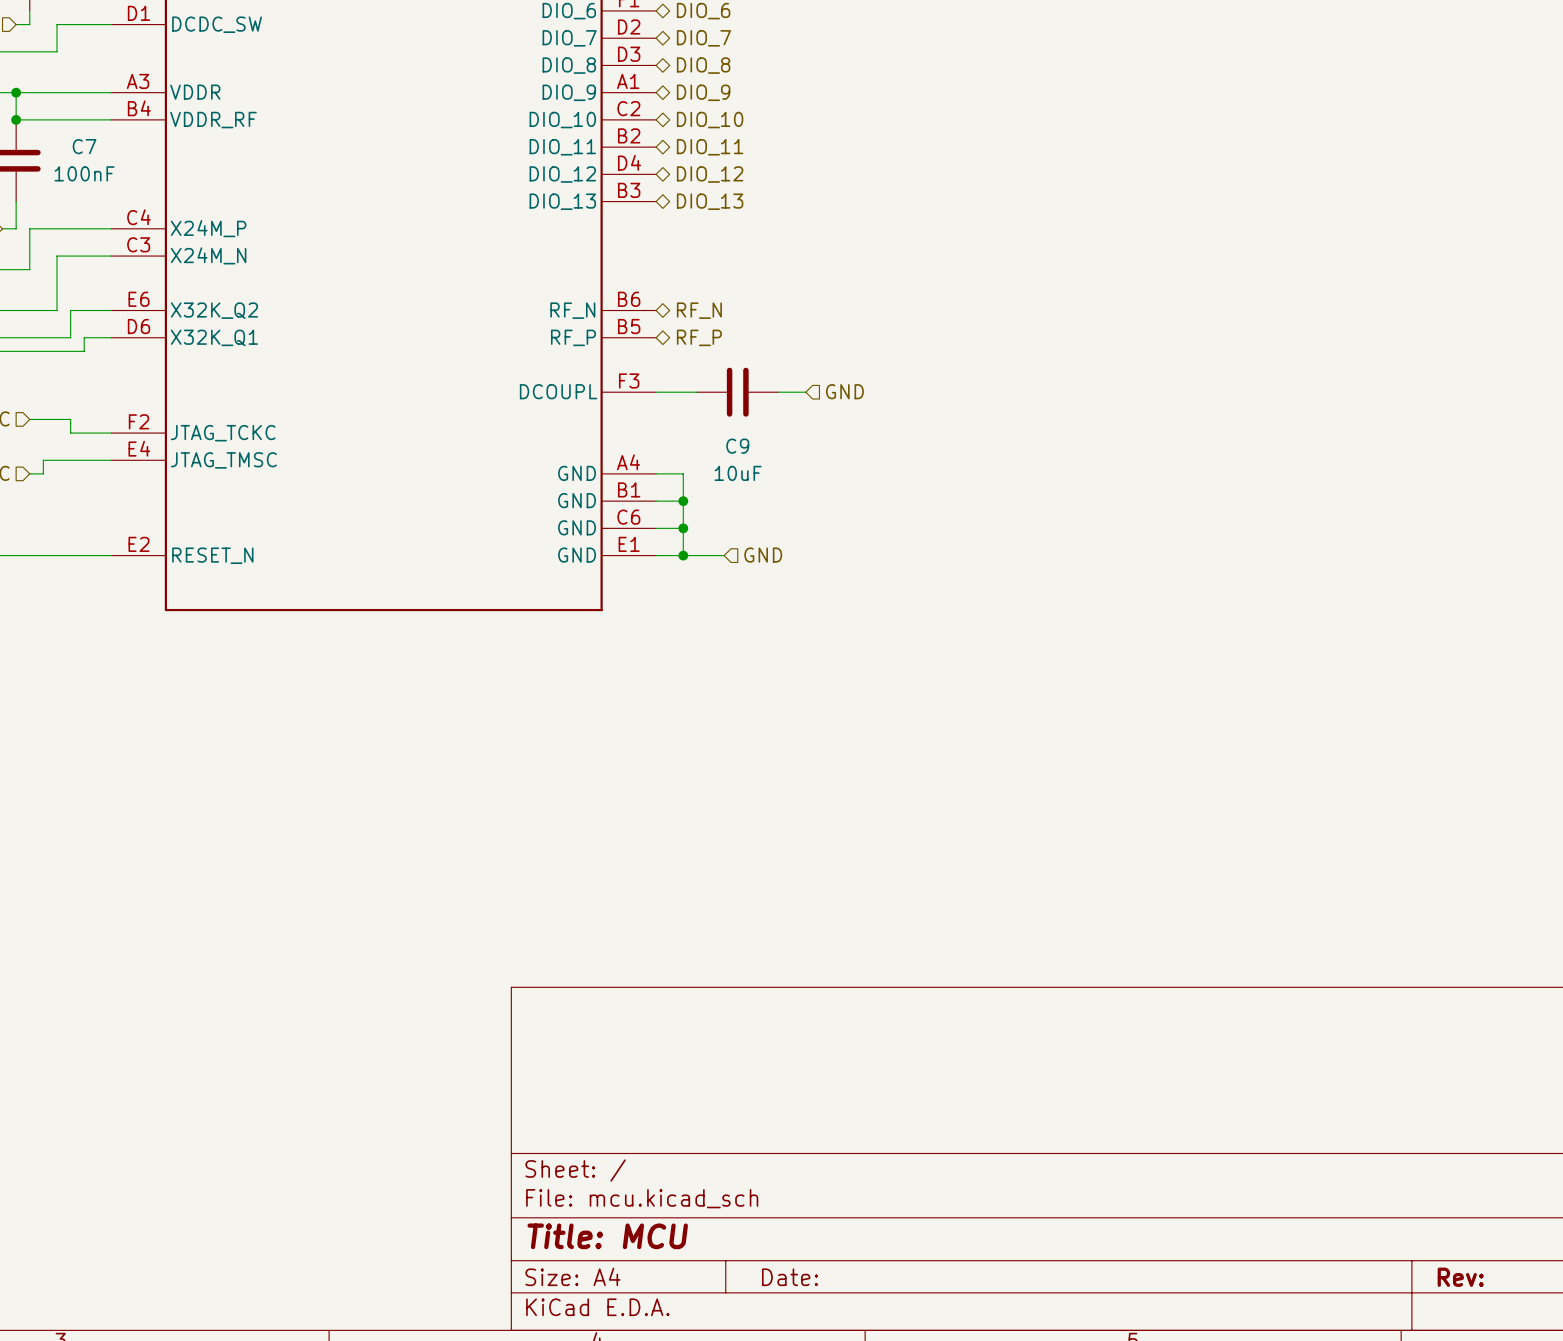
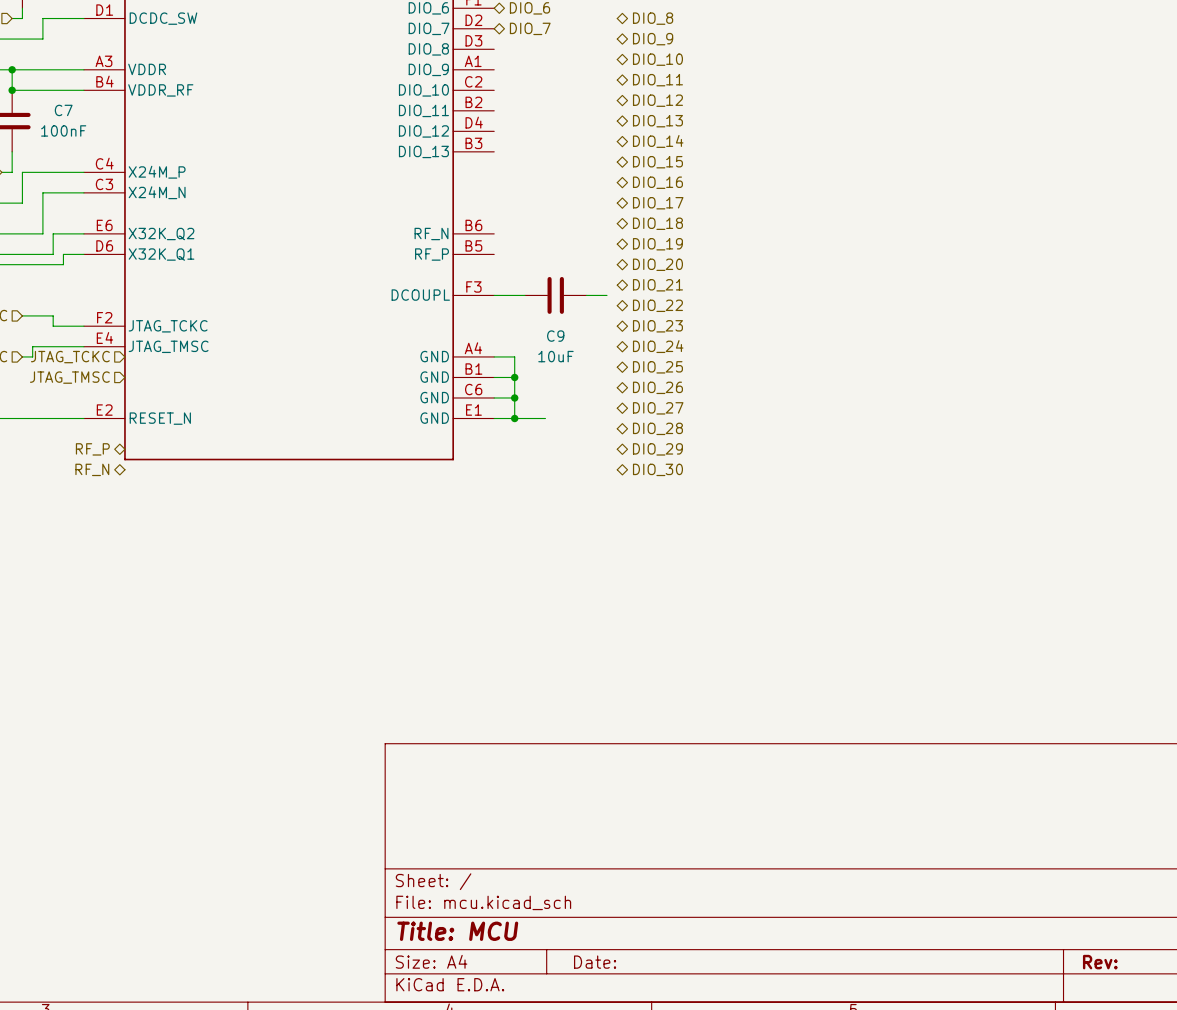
hierarchical label position: DIO_8 (703, 65) -> DIO_8 (653, 18)
hierarchical label position: DIO_9 (703, 92) -> DIO_9 (653, 39)
hierarchical label position: DIO_10 (710, 120) -> DIO_10 (657, 59)
hierarchical label position: DIO_11 (710, 147) -> DIO_11 (657, 80)
hierarchical label position: DIO_12 (710, 174) -> DIO_12 (657, 100)
hierarchical label: none -> DIO_14 (658, 141)
hierarchical label position: DIO_13 (710, 201) -> DIO_13 (657, 121)
hierarchical label: none -> DIO_15 (657, 162)
hierarchical label: none -> DIO_16 (657, 182)
hierarchical label: none -> DIO_17 (658, 203)
hierarchical label: none -> DIO_18 (657, 223)
hierarchical label: RF_N (699, 310) -> none
hierarchical label: none -> DIO_19 (657, 244)
hierarchical label: RF_P (699, 337) -> none
hierarchical label: none -> DIO_20 (657, 264)
hierarchical label: none -> DIO_21 (657, 285)
hierarchical label: GND (844, 391) -> none
hierarchical label: none -> DIO_22 (657, 305)
hierarchical label: none -> DIO_23 (657, 326)
hierarchical label: none -> DIO_24 (658, 346)
hierarchical label: none -> JTAG_TCKC (70, 357)
hierarchical label: none -> DIO_25 (657, 367)
hierarchical label: none -> JTAG_TMSC (69, 377)
hierarchical label: none -> DIO_26 (657, 387)
hierarchical label: none -> DIO_27 (658, 408)
hierarchical label: GND (763, 555) -> none
hierarchical label: none -> DIO_28 (657, 428)
hierarchical label: none -> RF_P (92, 449)
hierarchical label: none -> DIO_29 (657, 449)
hierarchical label: none -> RF_N (92, 469)
hierarchical label: none -> DIO_30 (657, 469)

